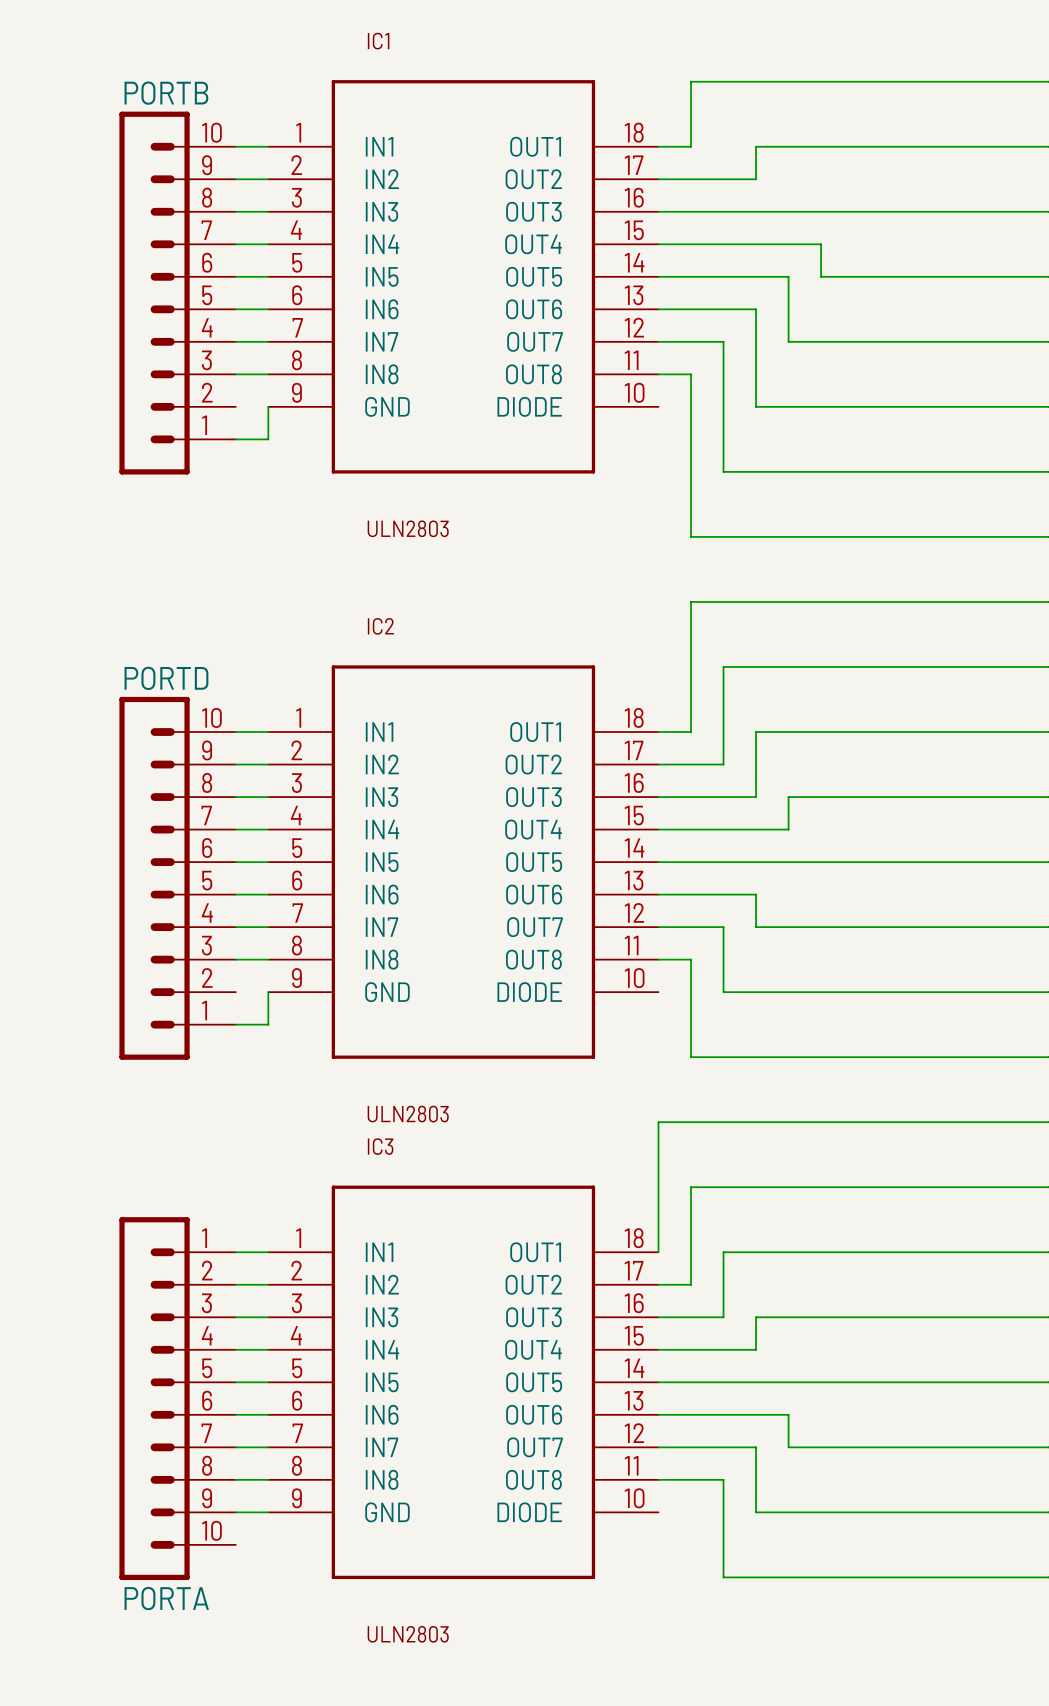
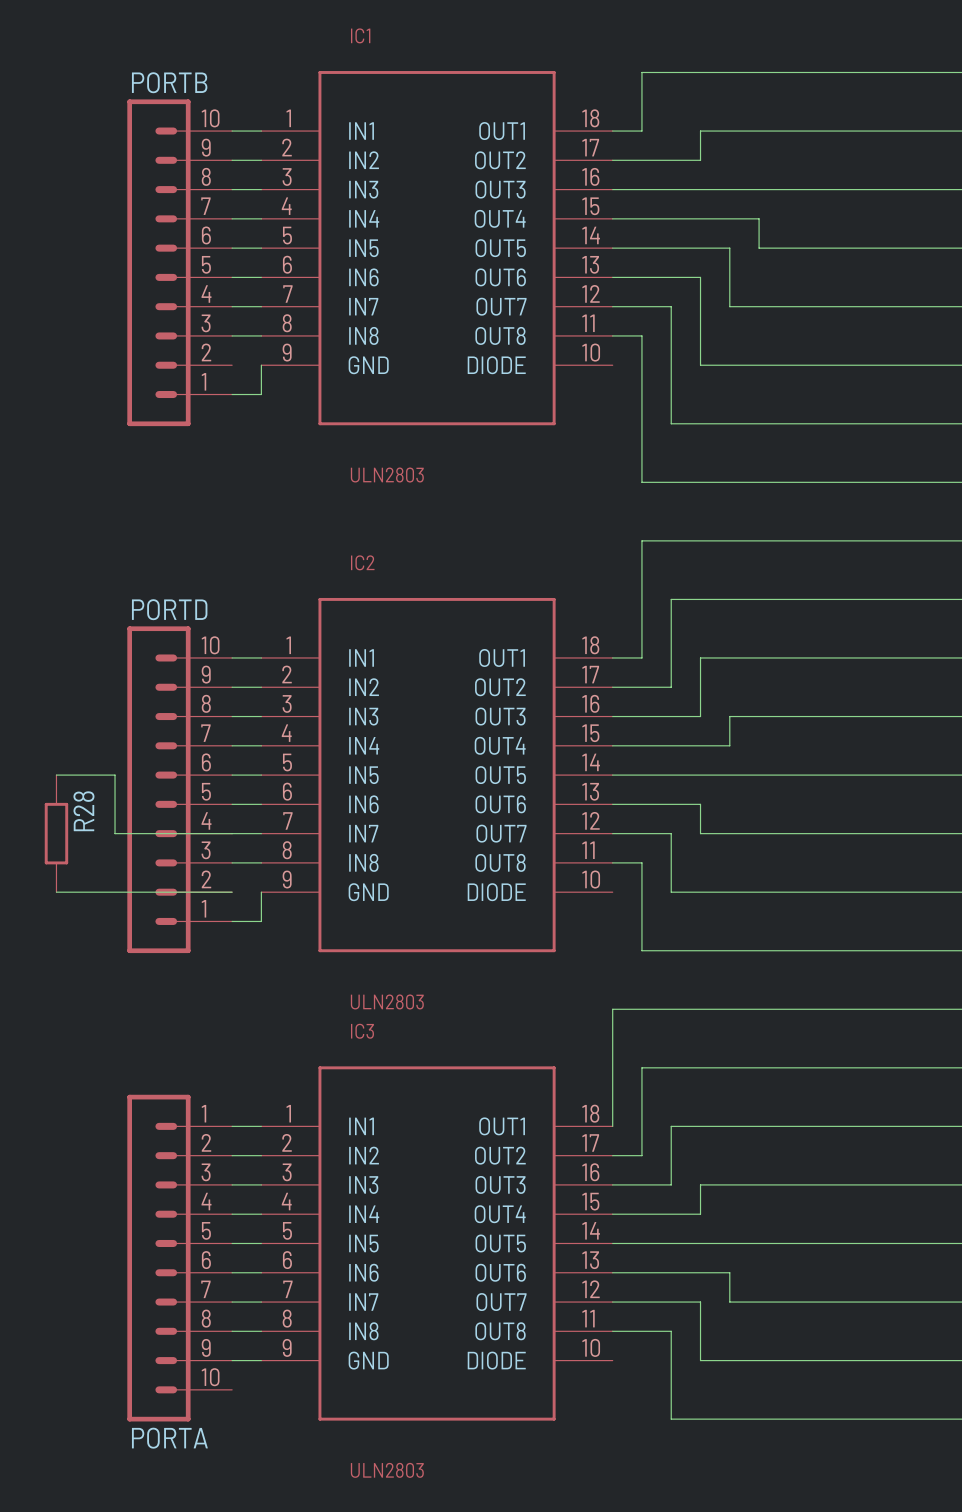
wire: none -> (56, 775) (115, 775) (115, 833) (232, 833)
R28: none -> (56, 833)
wire: none -> (56, 892) (232, 892)

